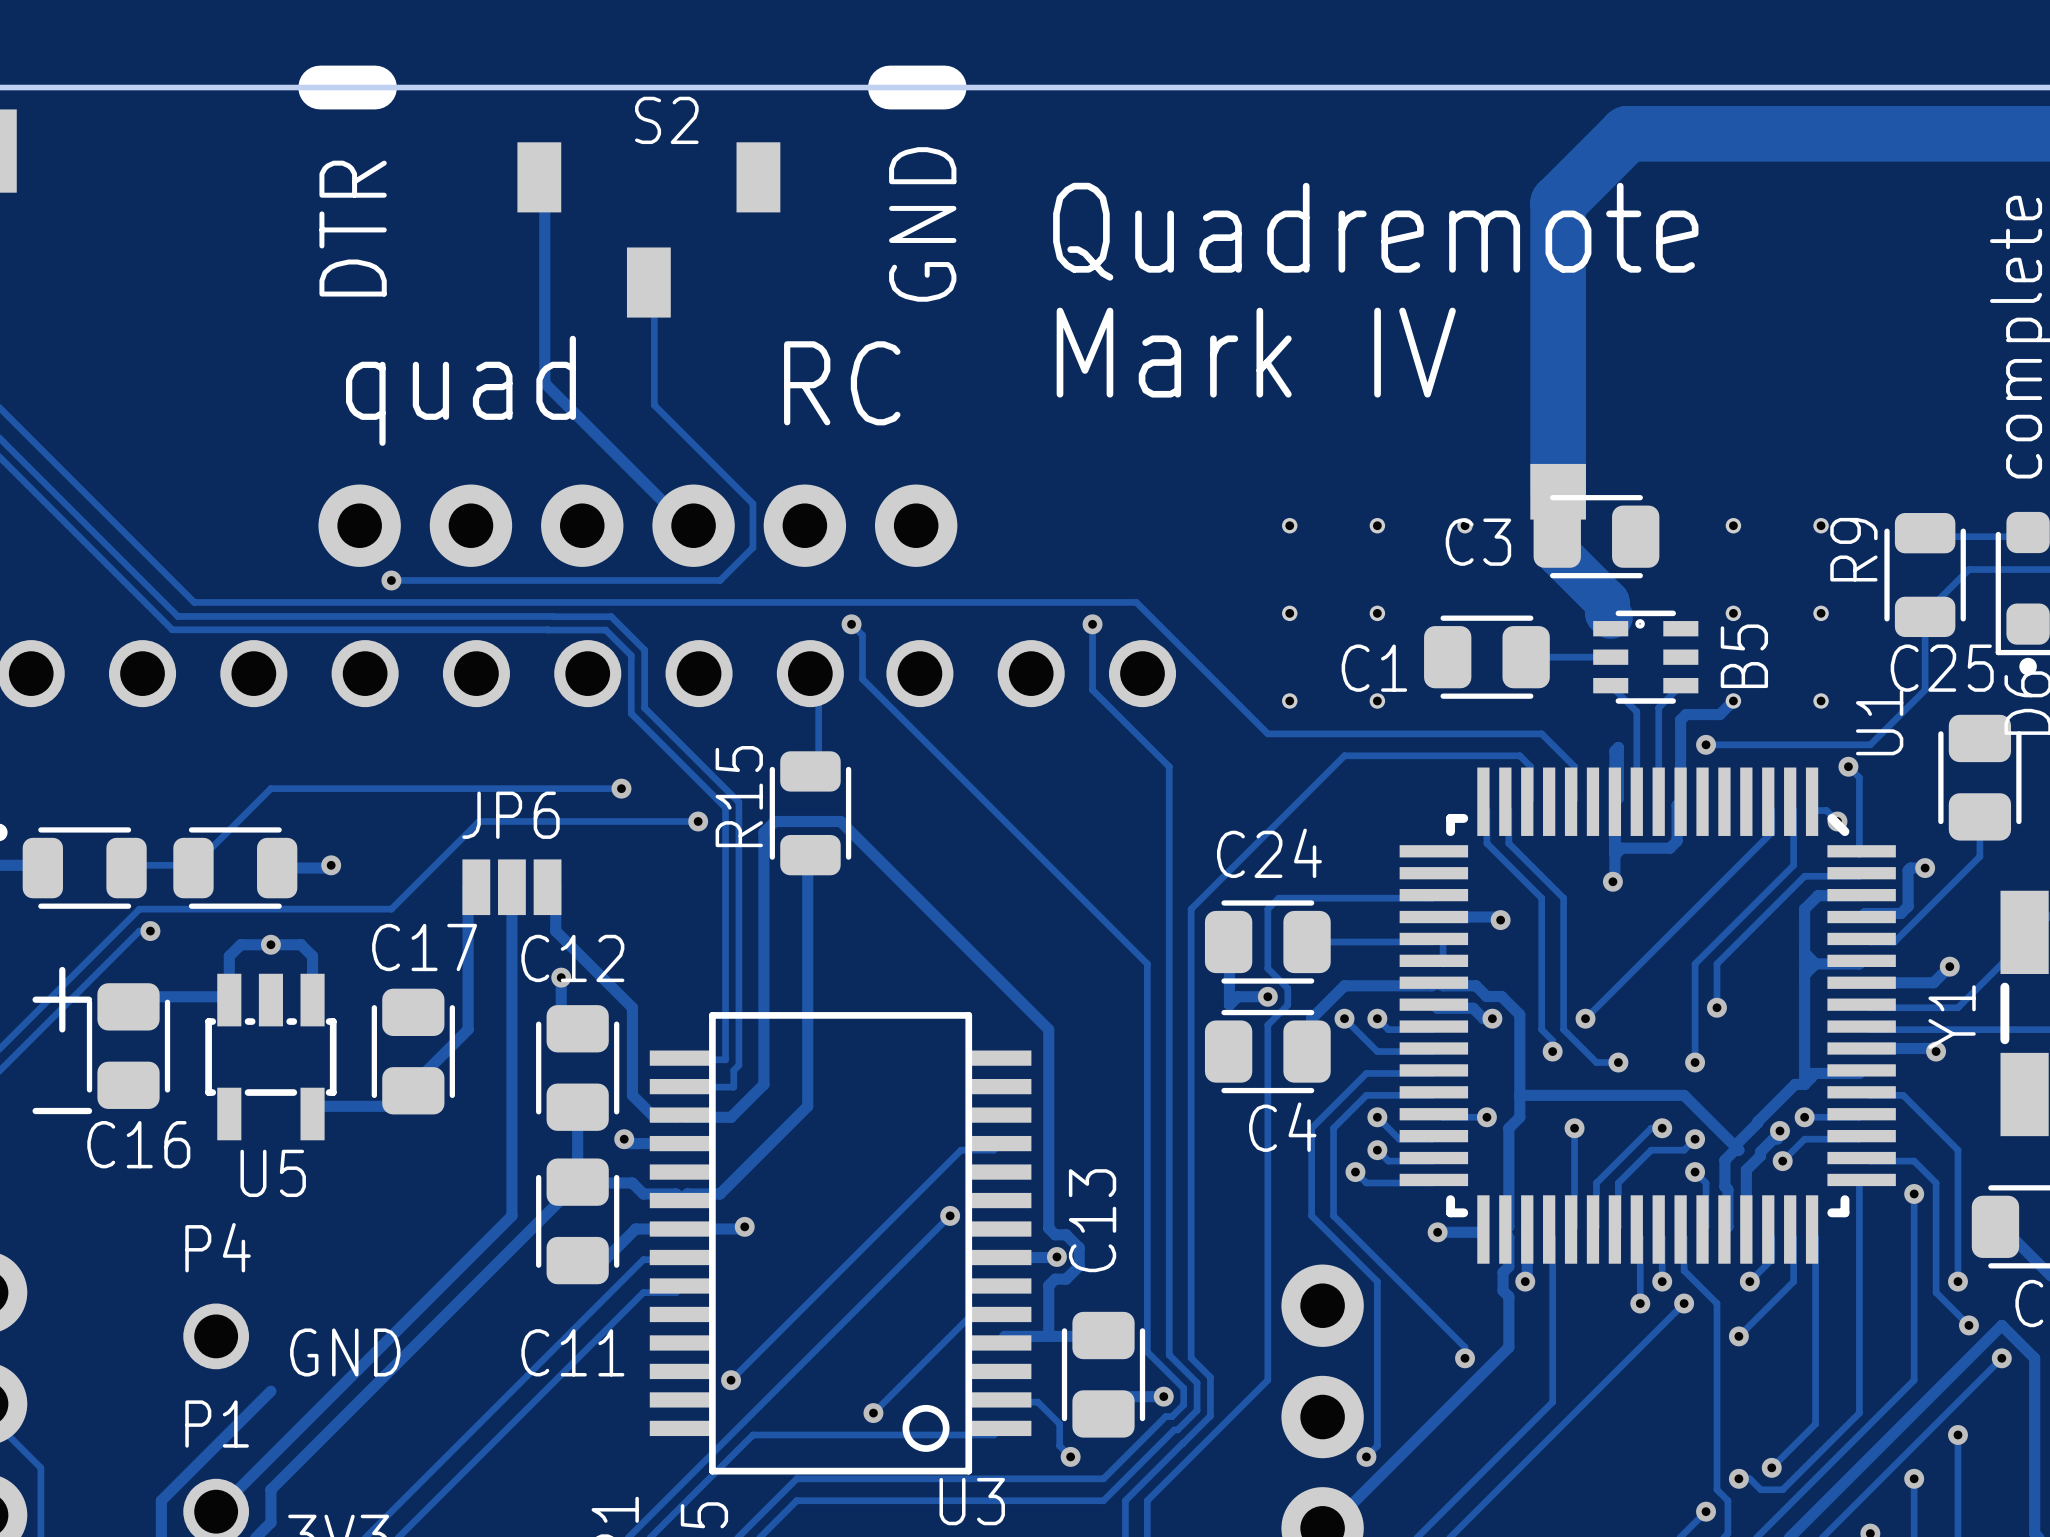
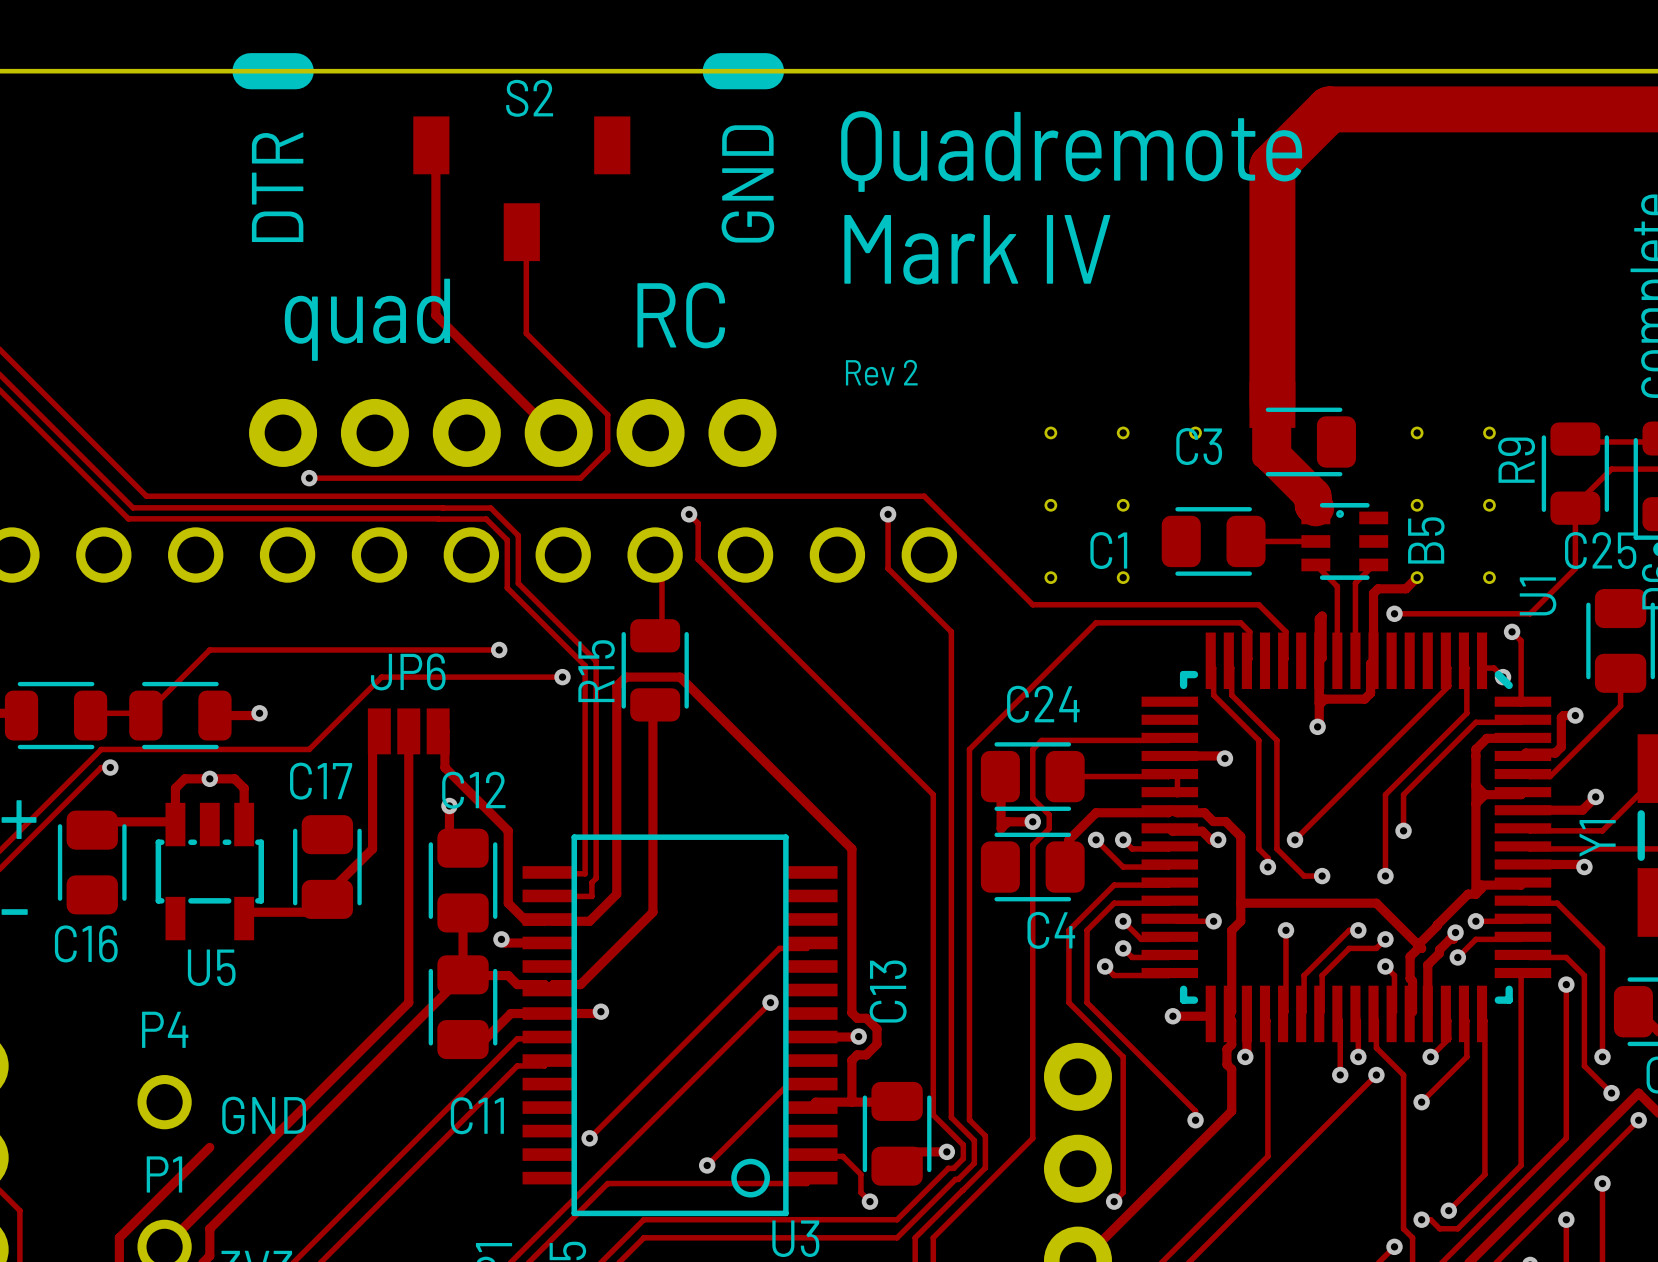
text position: Quadremote (1375, 231) -> Quadremote (1071, 151)
text position: Mark IV (1256, 352) -> Mark IV (977, 249)
text: none -> Rev 2 (881, 372)

